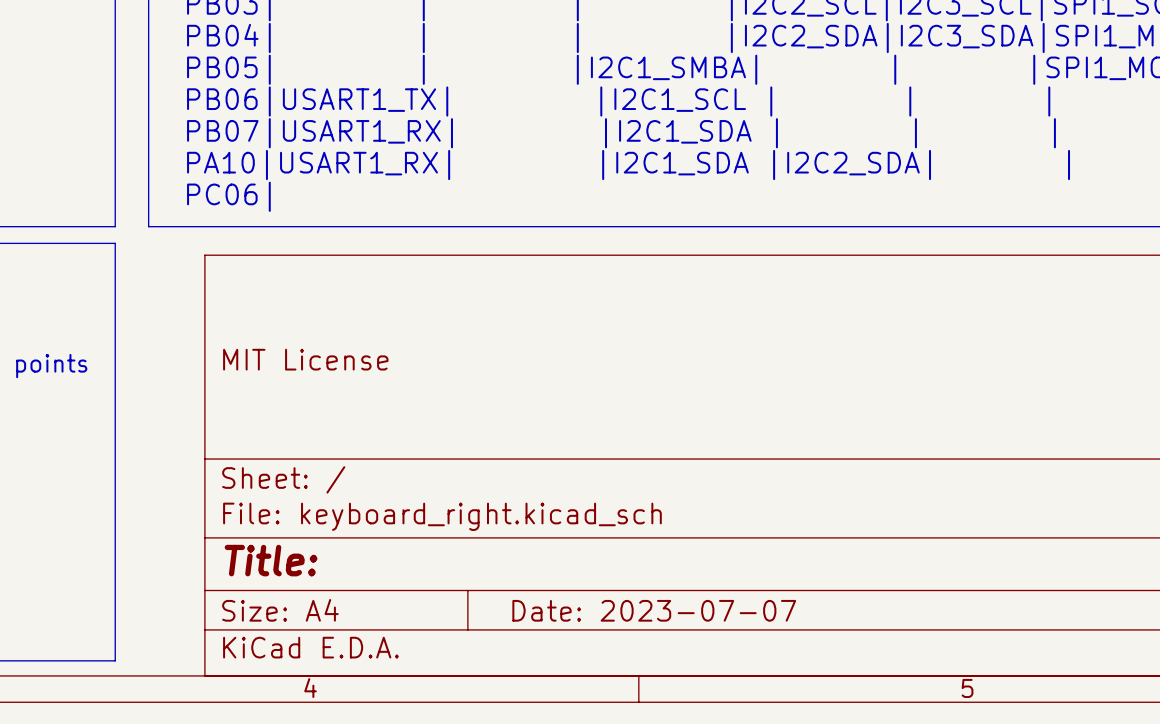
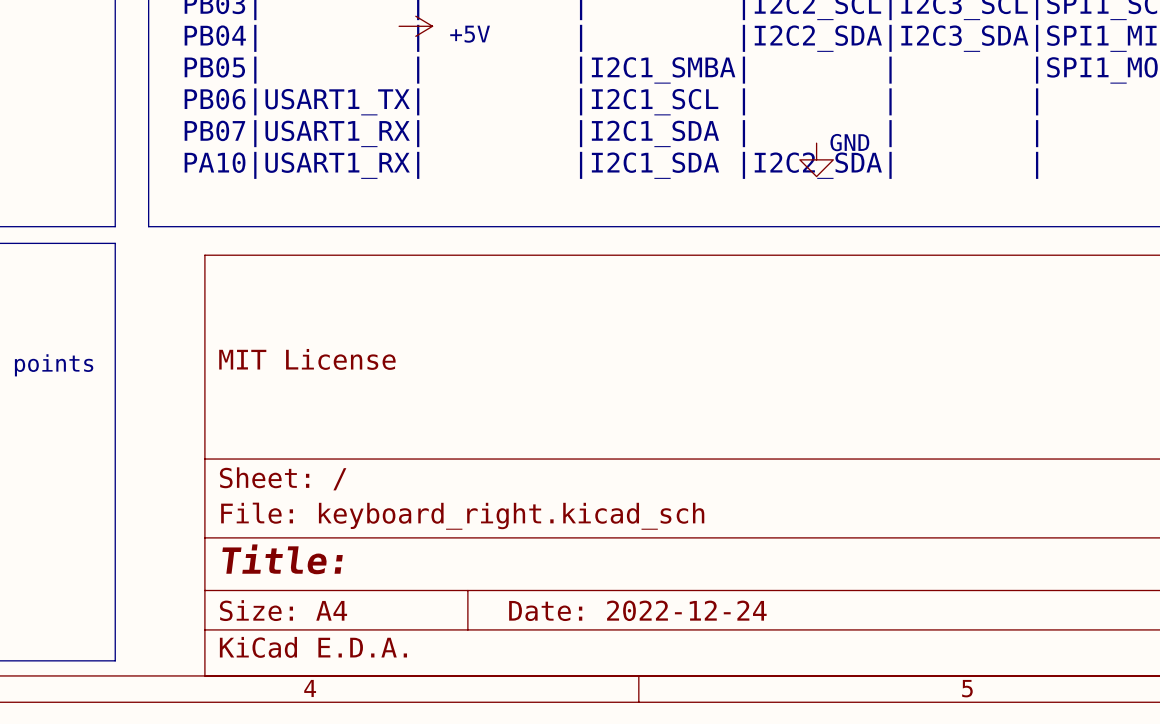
power symbol: none -> +5V (415, 26)
power symbol: none -> GND (816, 159)
text: PC06| (228, 196) -> none
title block: Date: 2023-07-07 (654, 610) -> Date: 2022-12-24 (637, 610)

